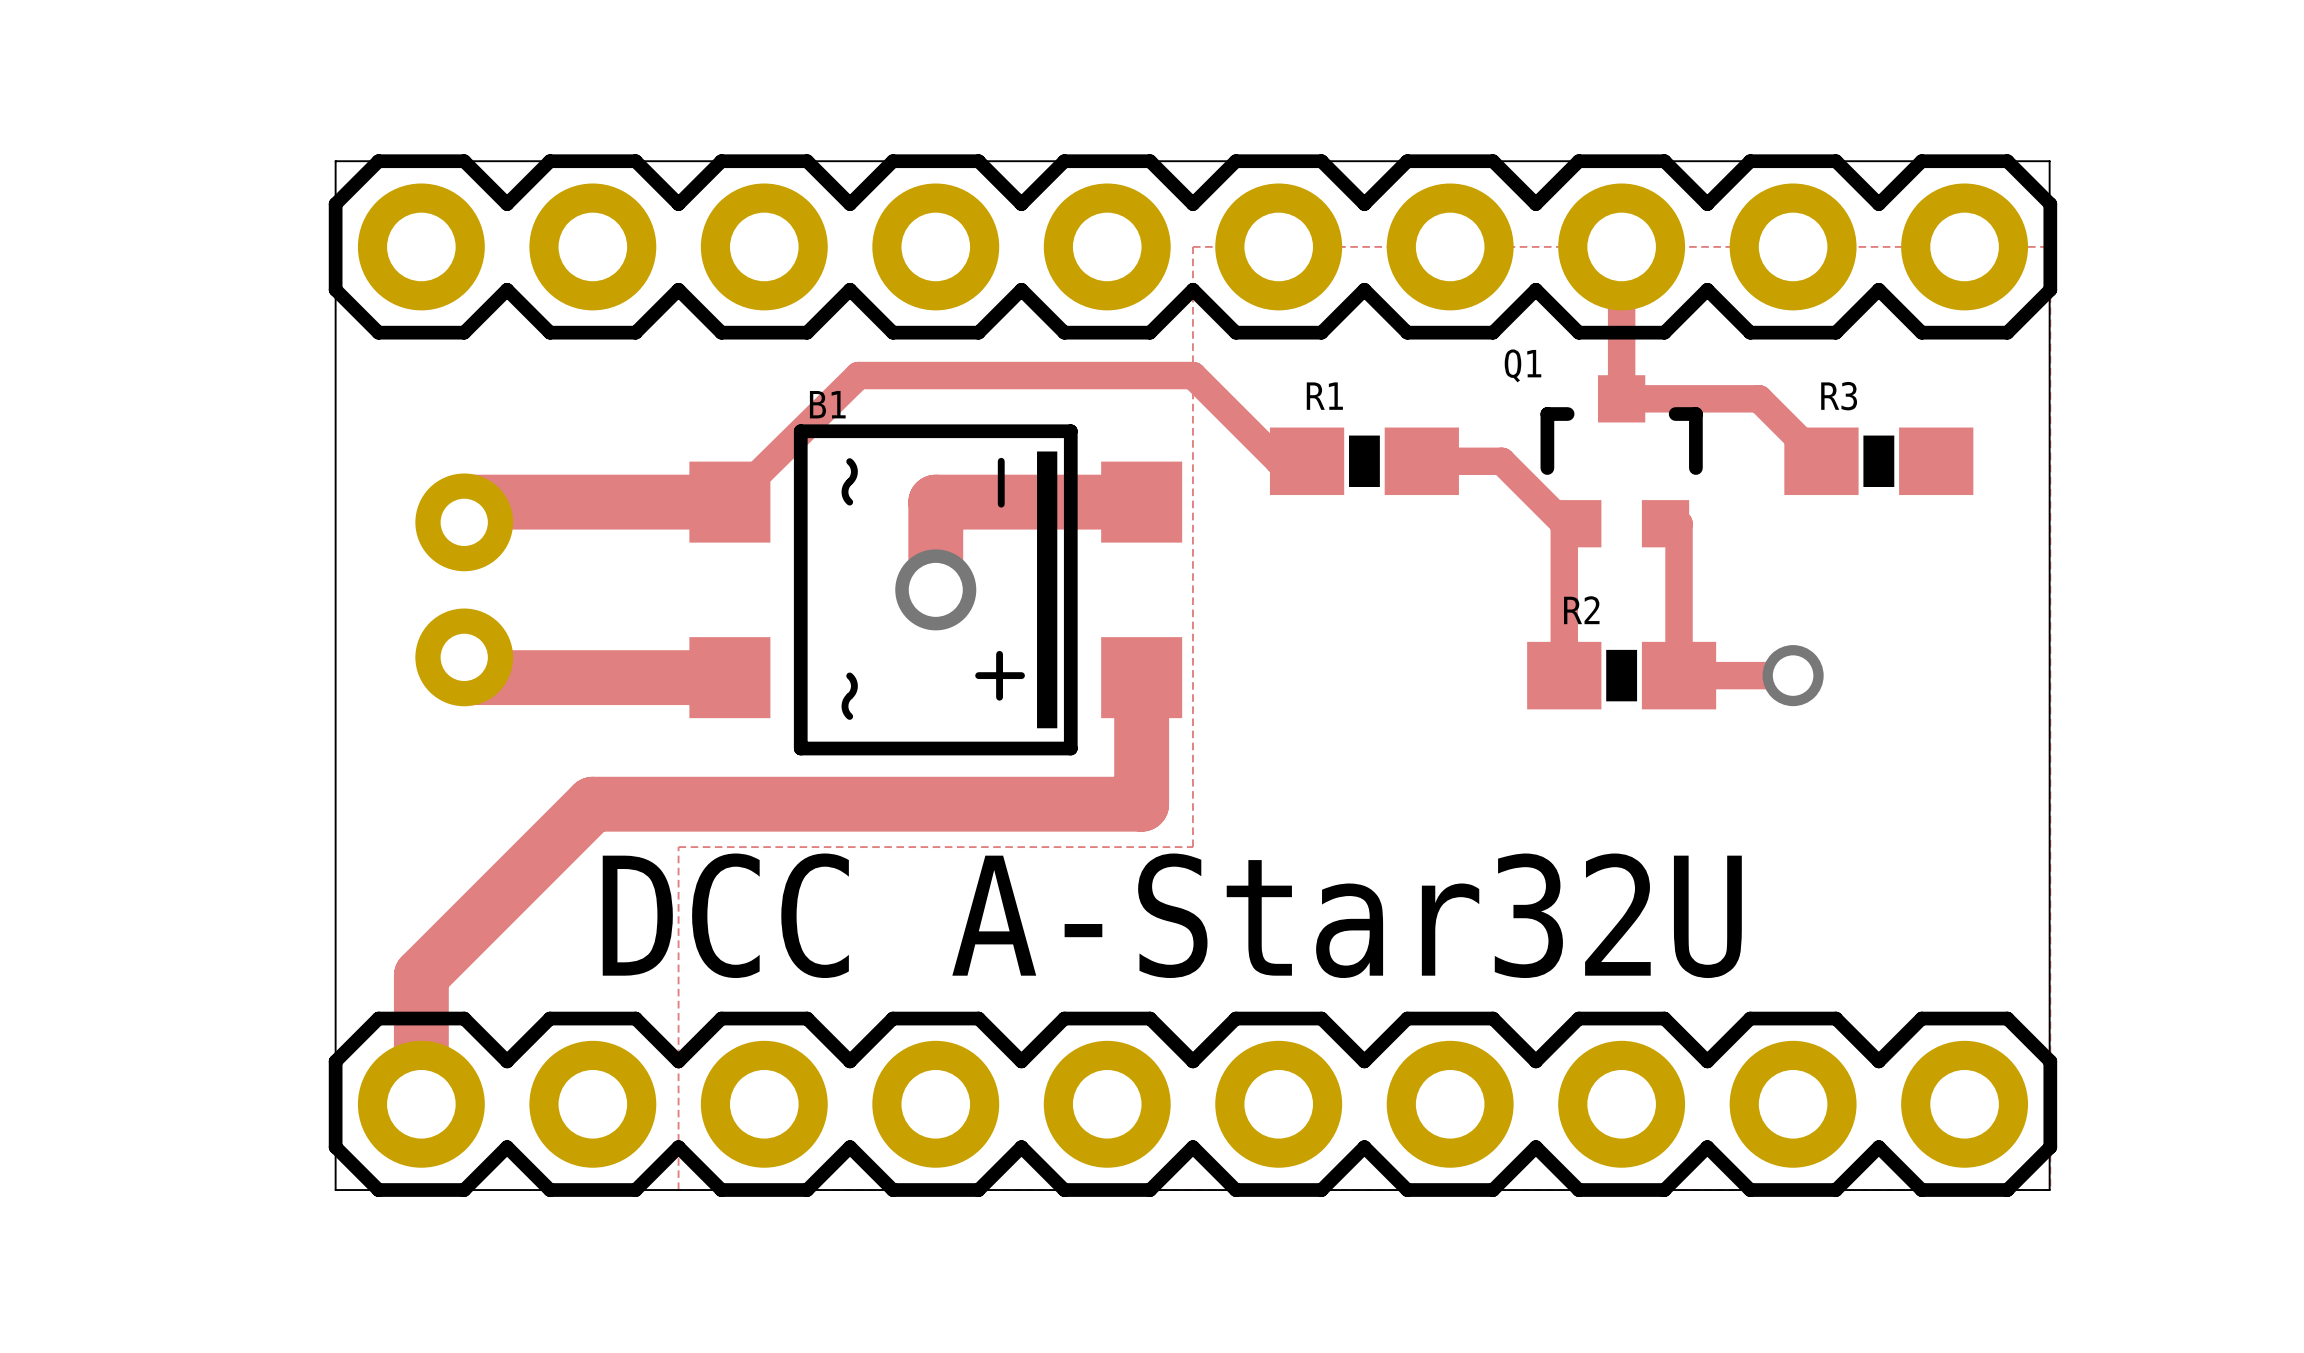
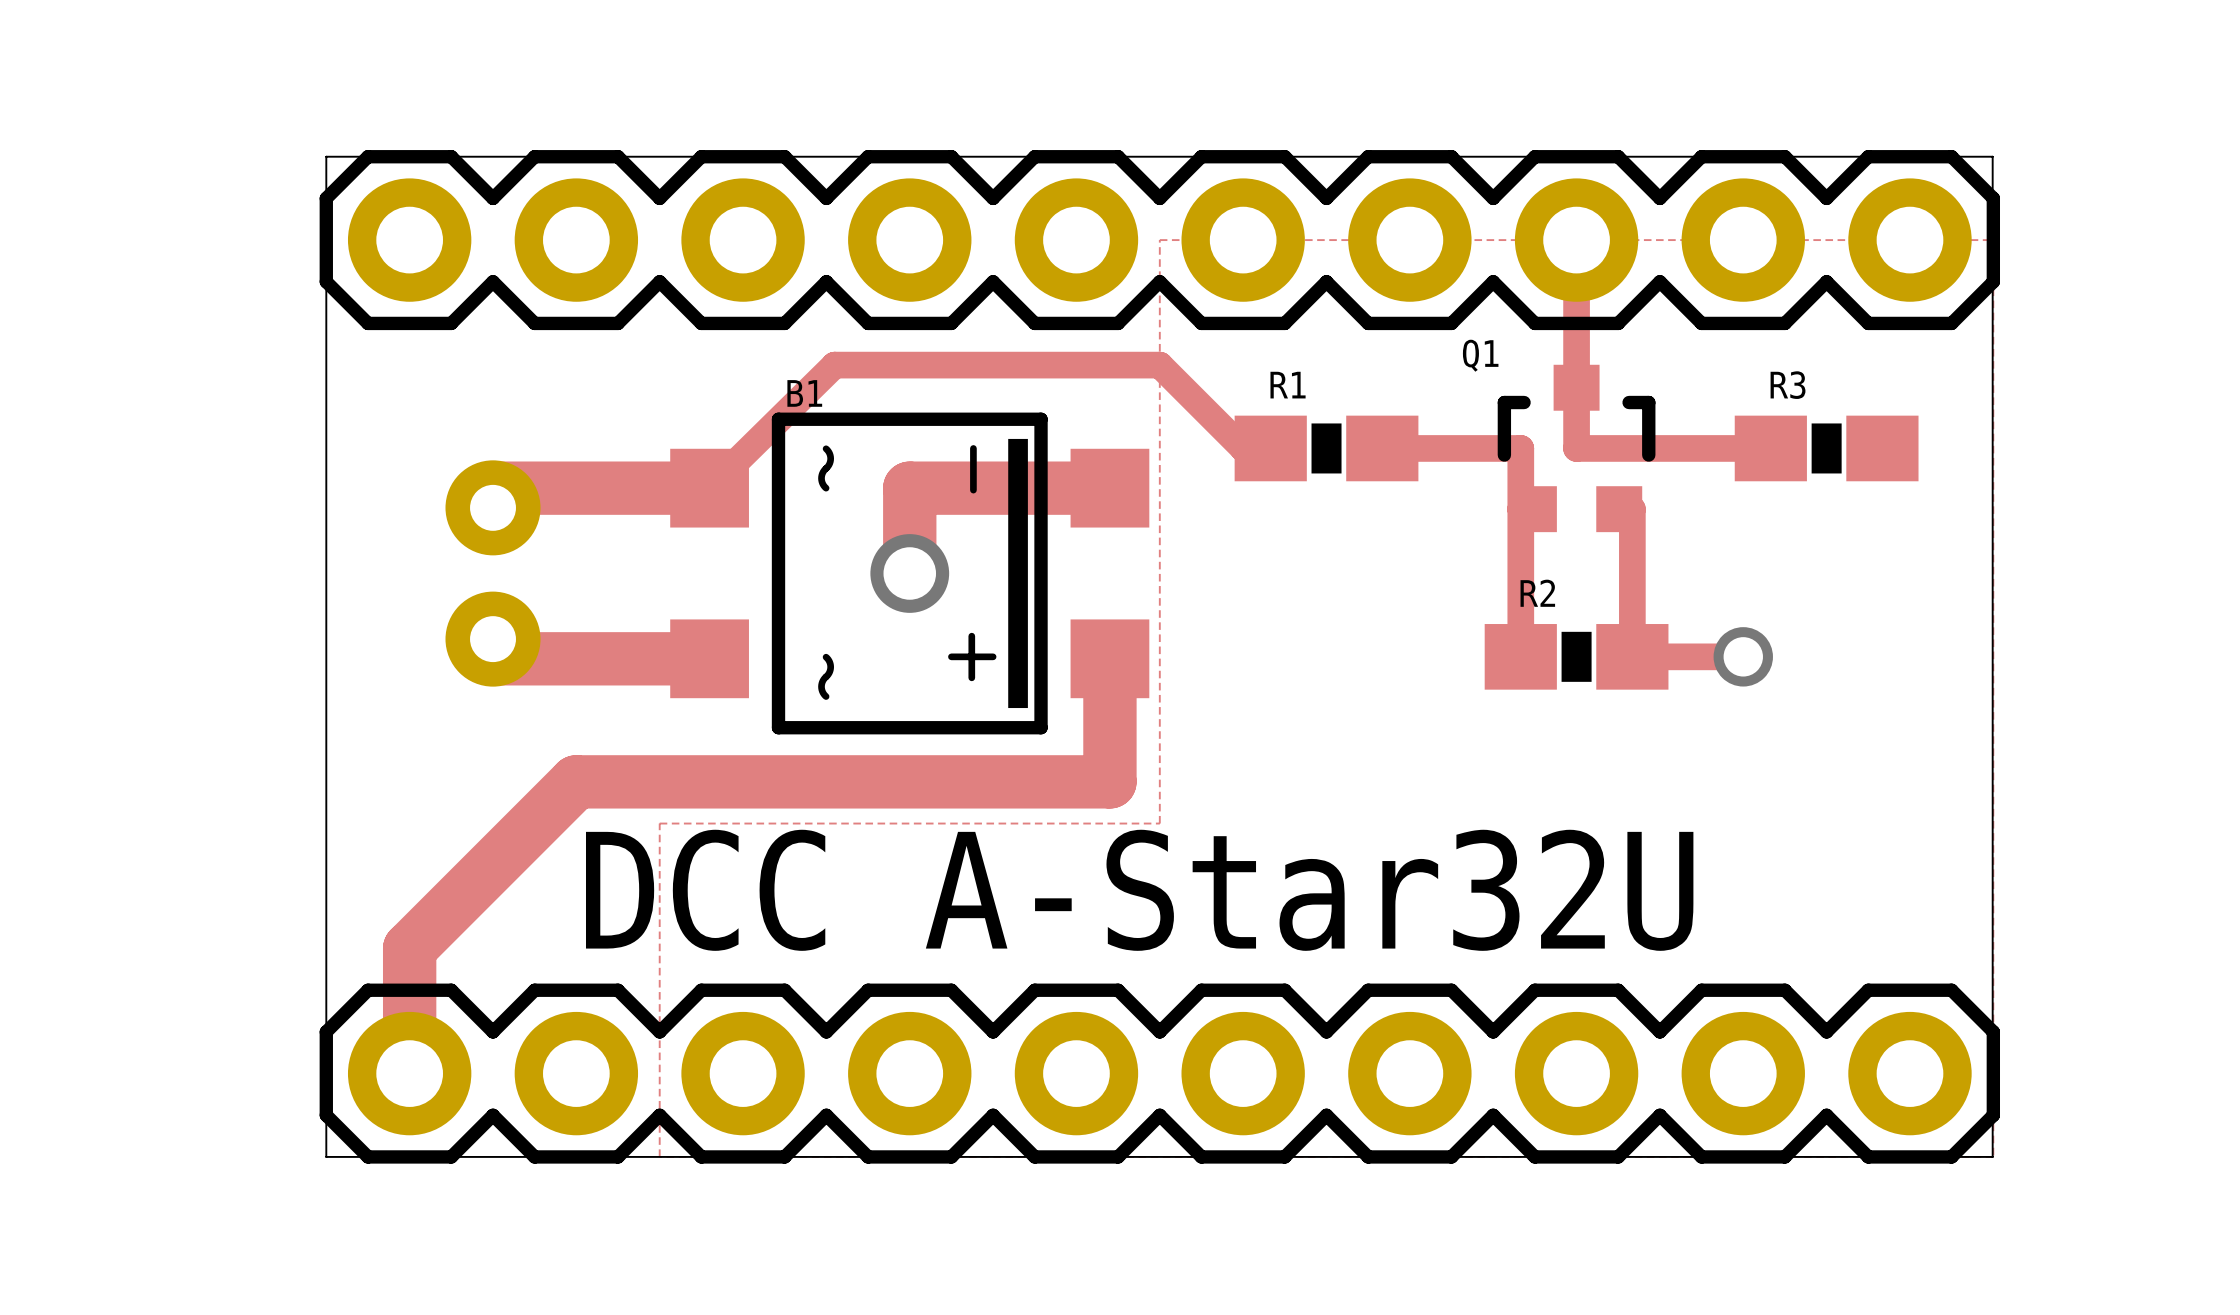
track: (1621, 398) (1759, 398) (1821, 461) -> (1576, 387) (1576, 448) (1770, 448)
track: (1501, 461) (1564, 523) -> (1460, 448) (1520, 448) (1520, 509)
part position: (464, 589) -> (493, 573)

